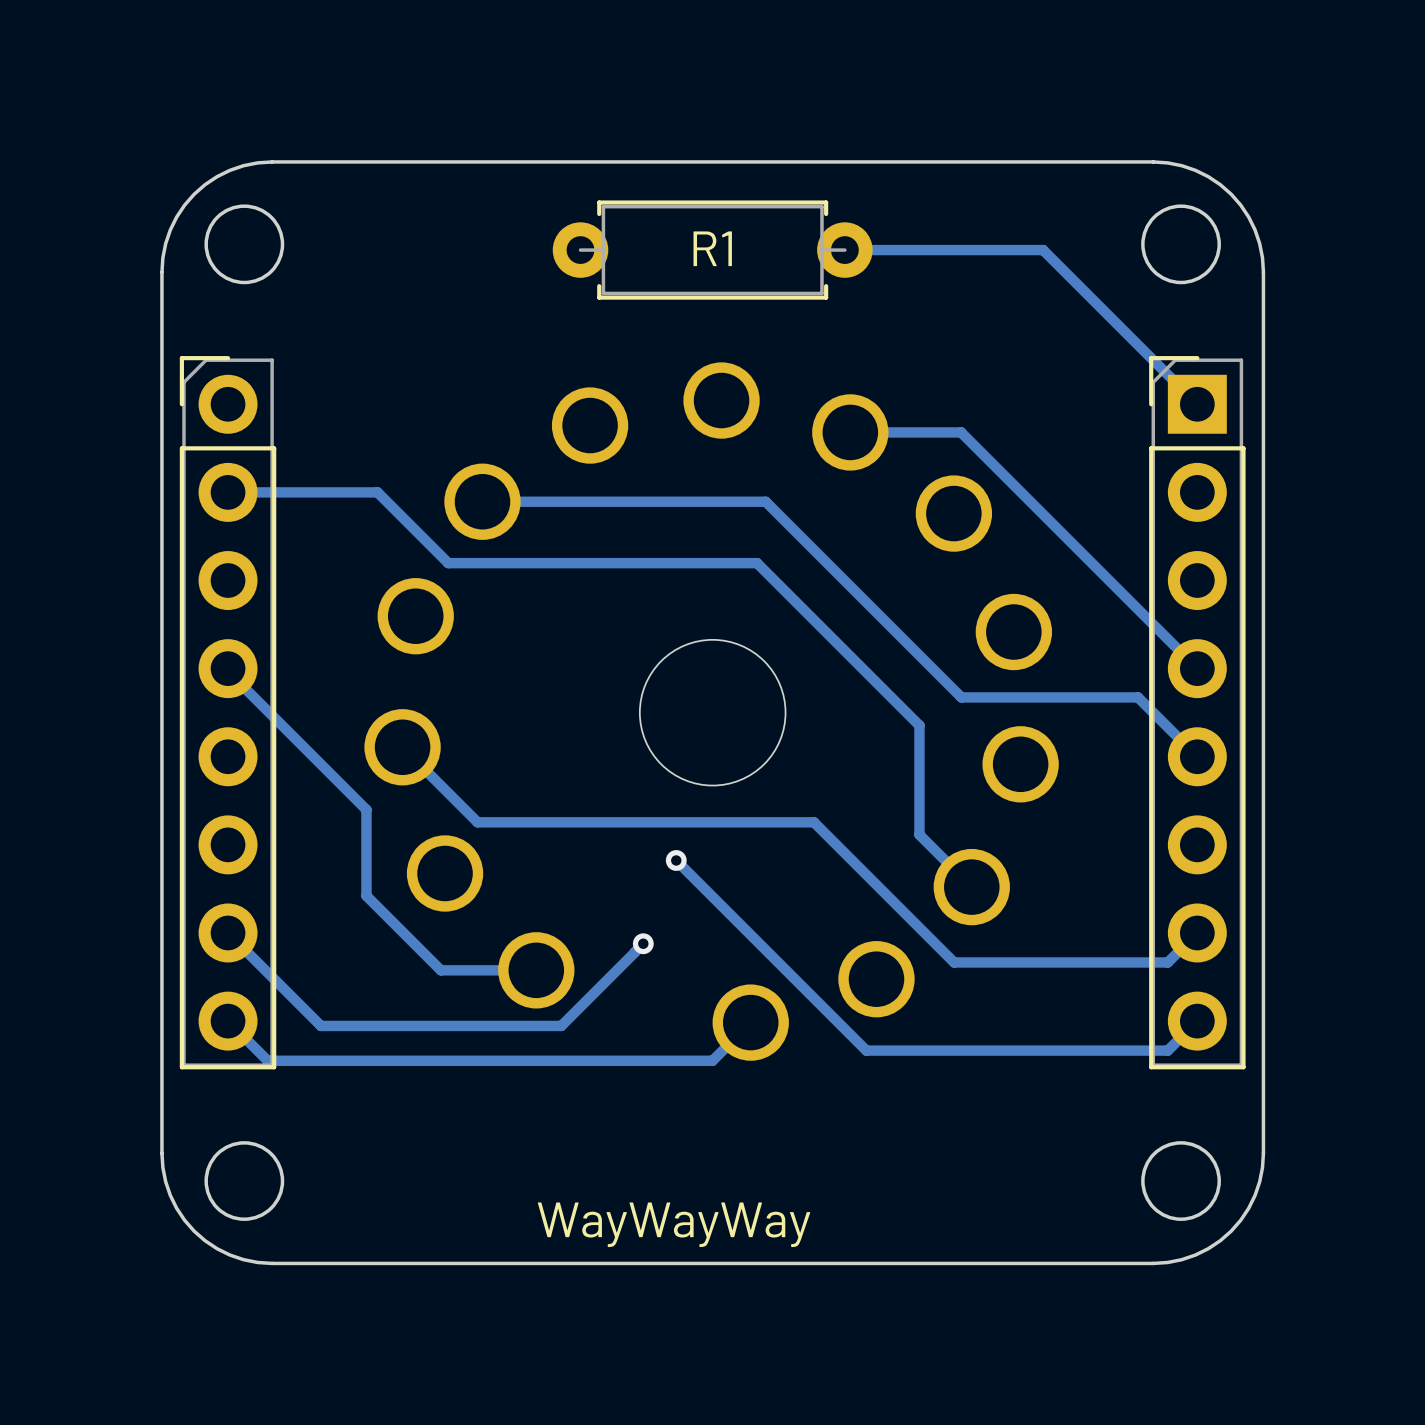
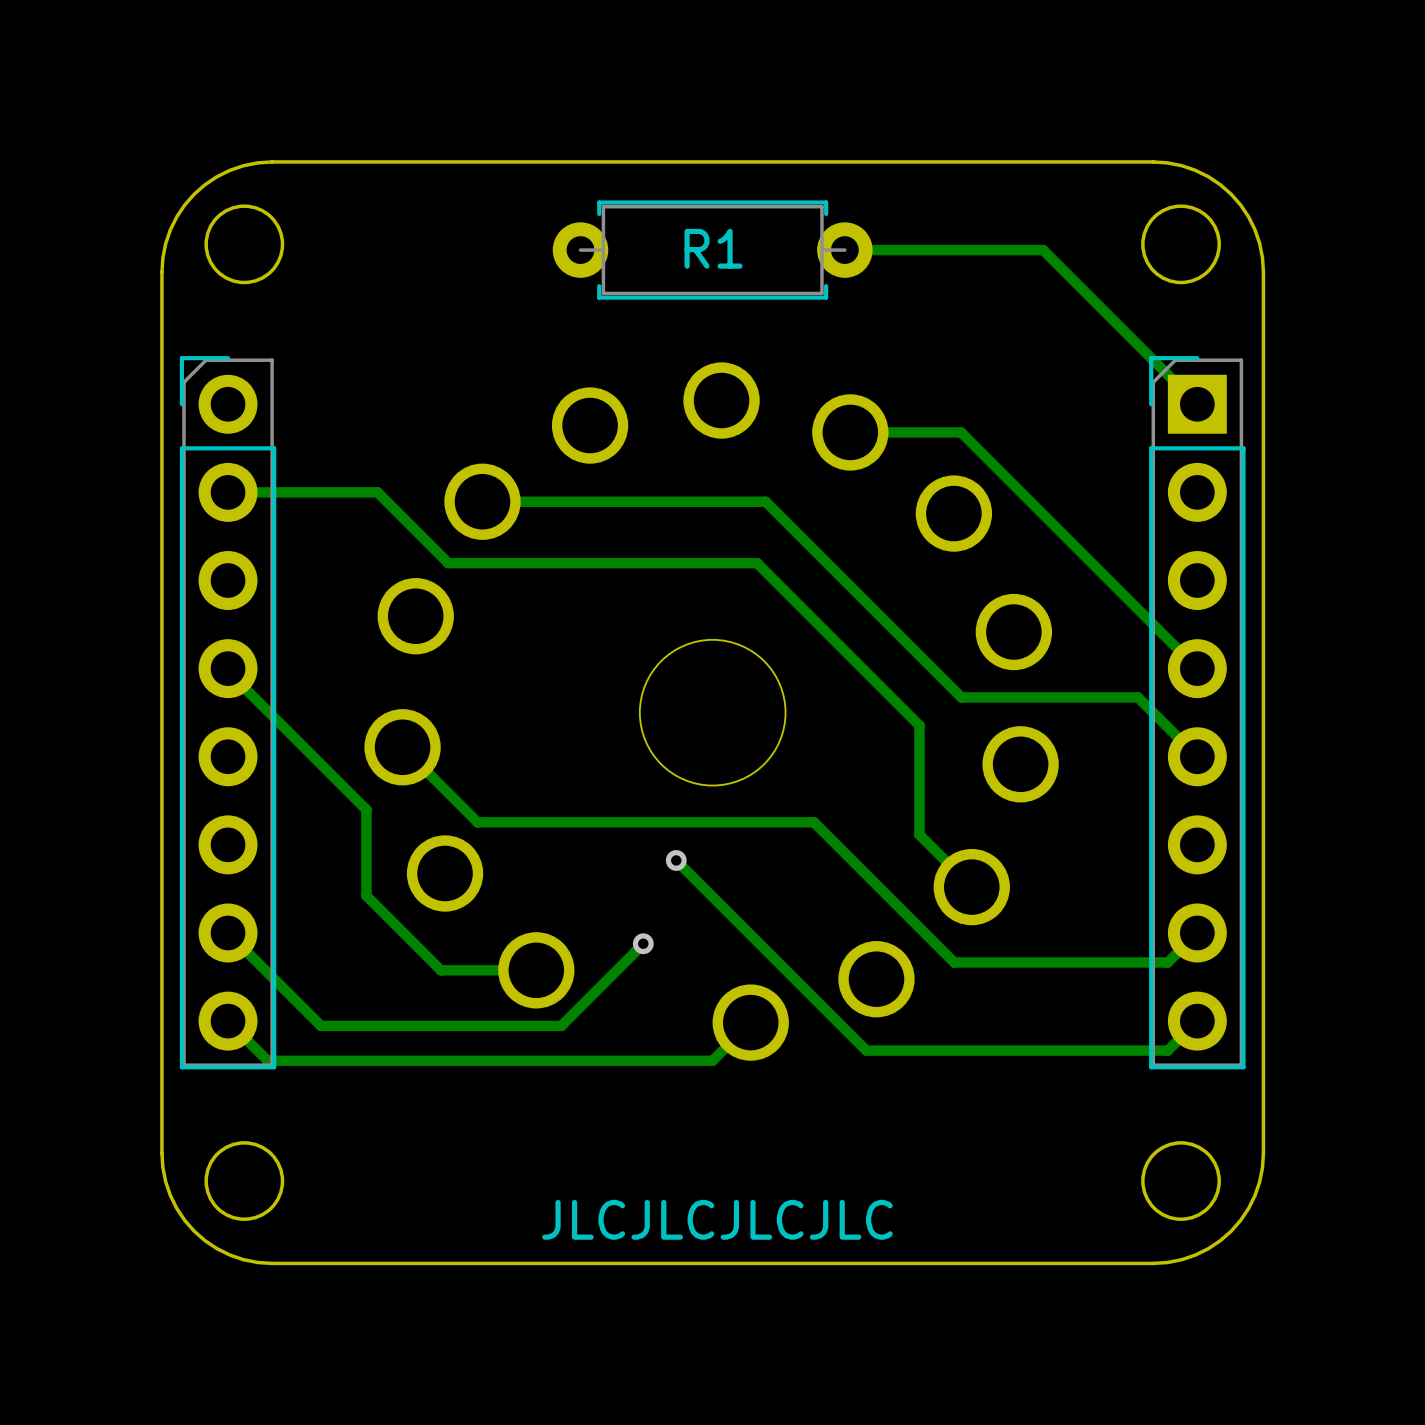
text: WayWayWay (674, 1224) -> JLCJLCJLCJLC (717, 1219)

